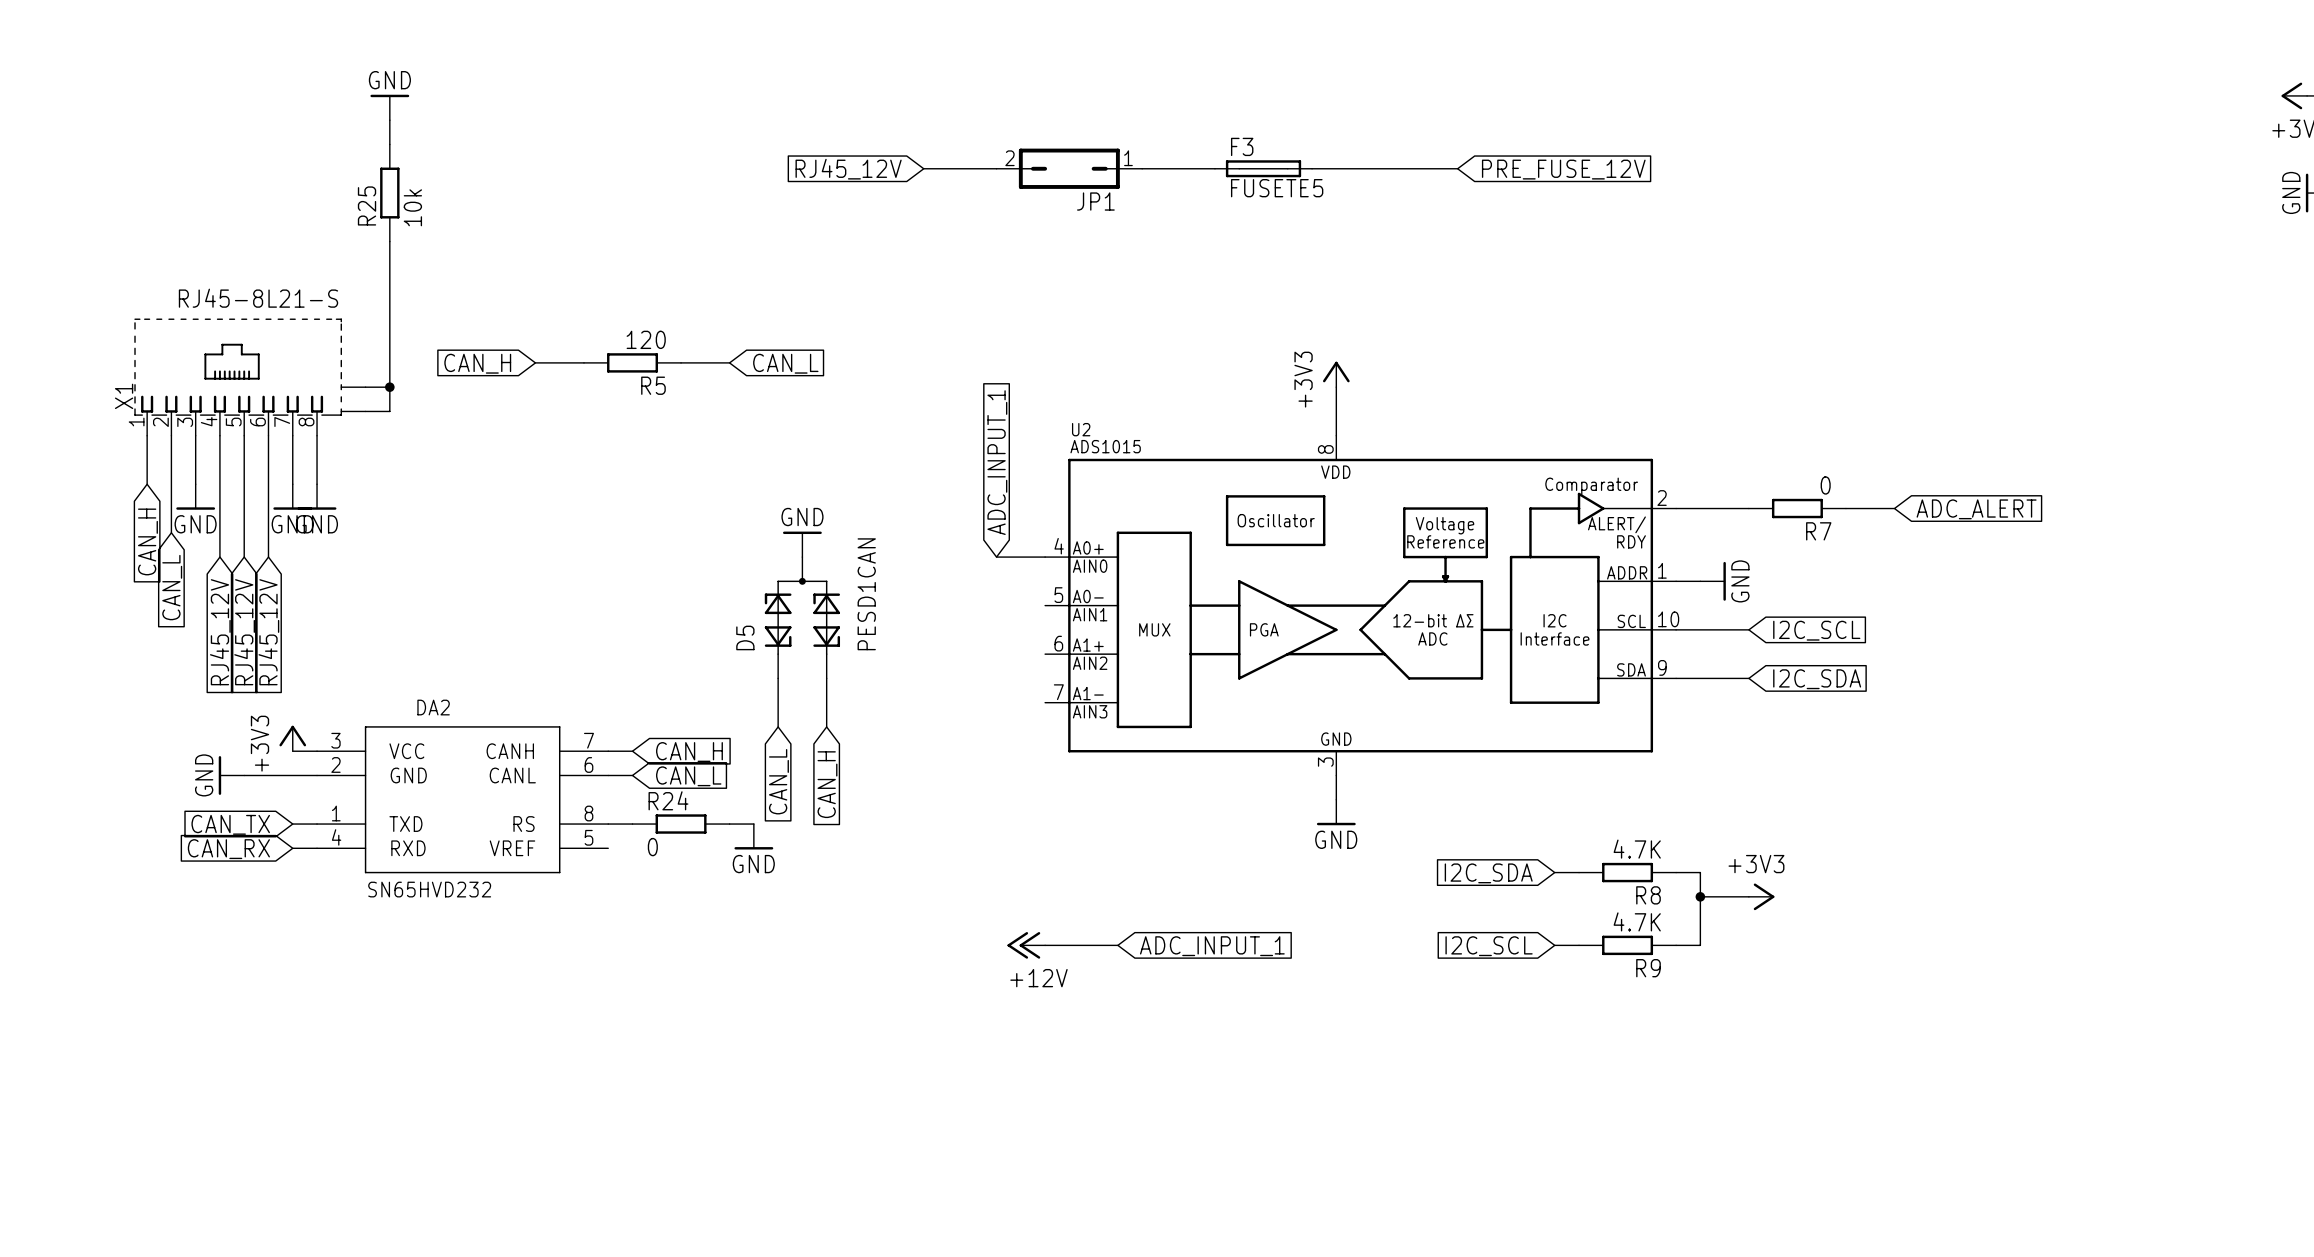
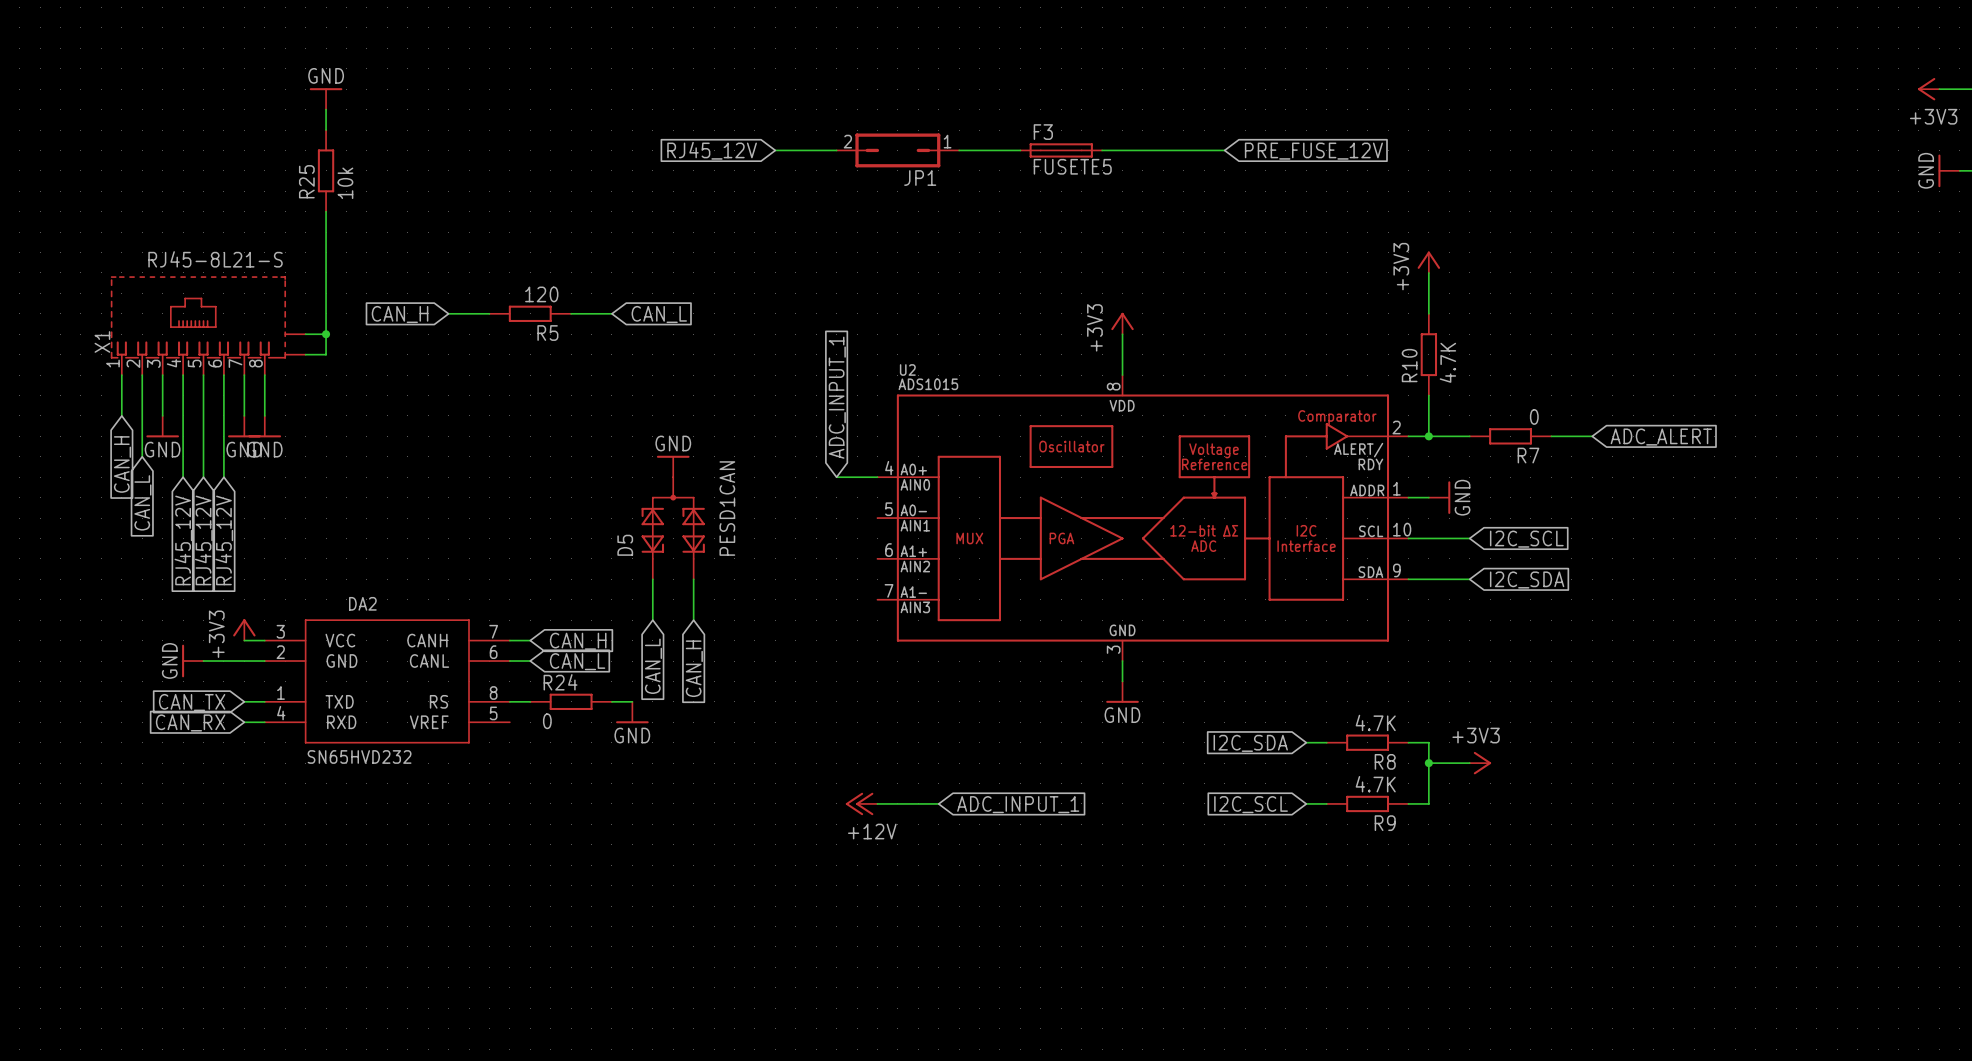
power symbol: none -> +3V3 (1428, 262)
wire: none -> (1428, 272) (1428, 313)
R10: none -> 4.7K (1428, 354)
wire: none -> (1428, 395) (1428, 436)
junction: none -> (1428, 436)

